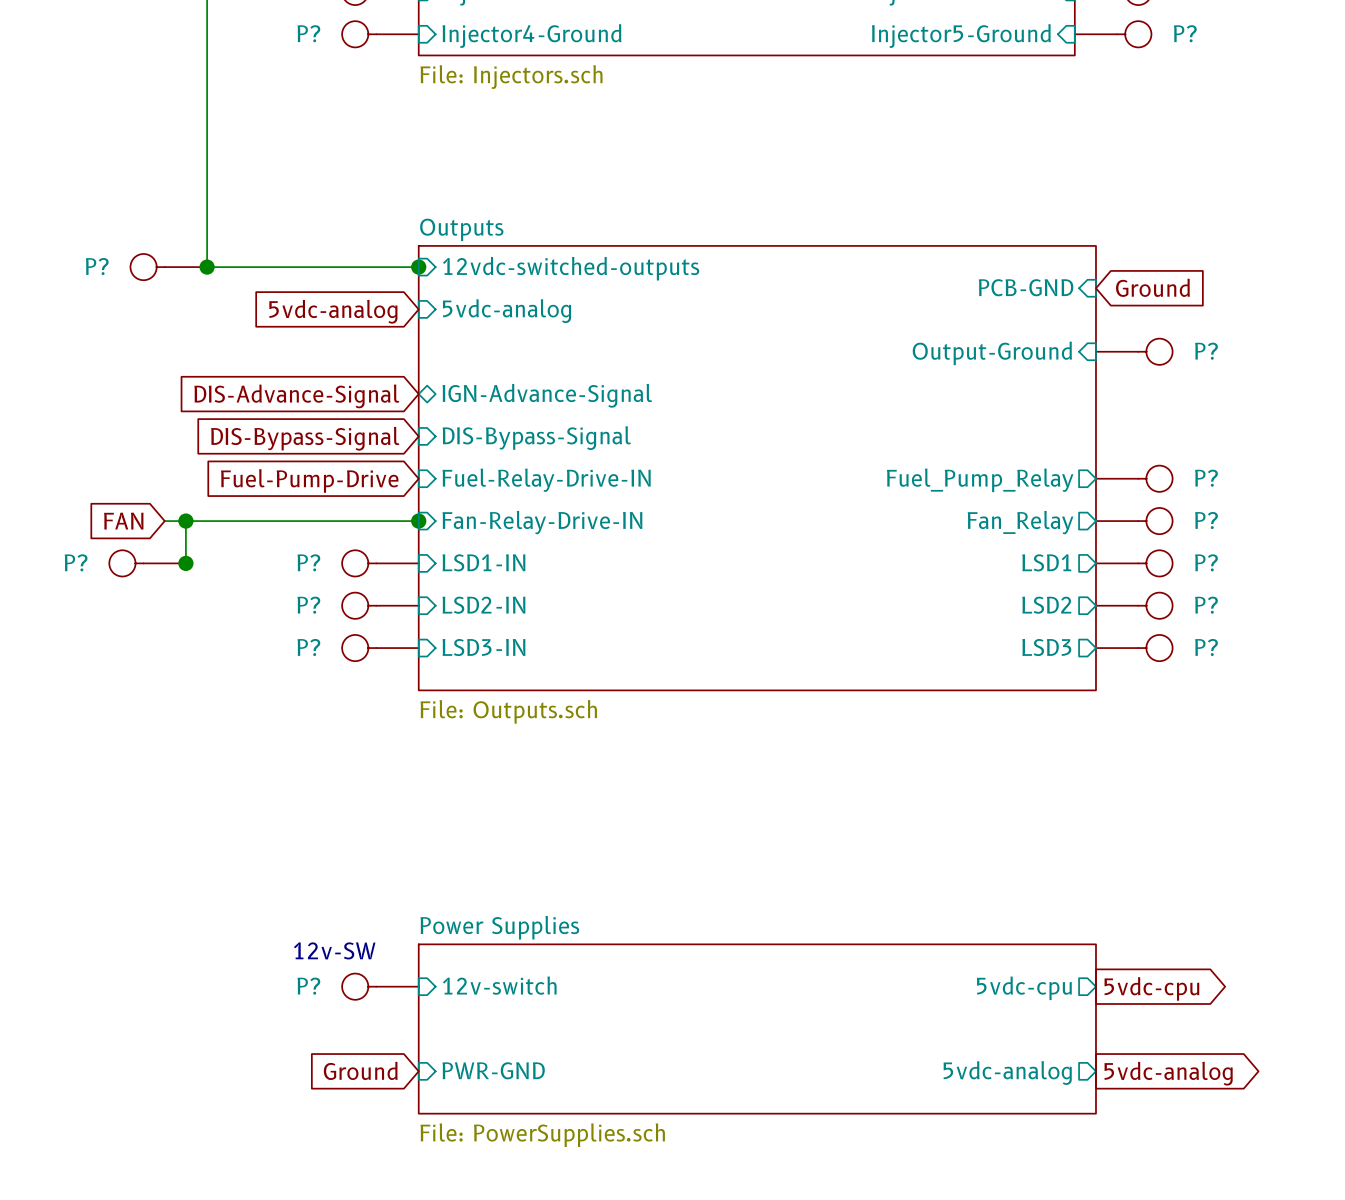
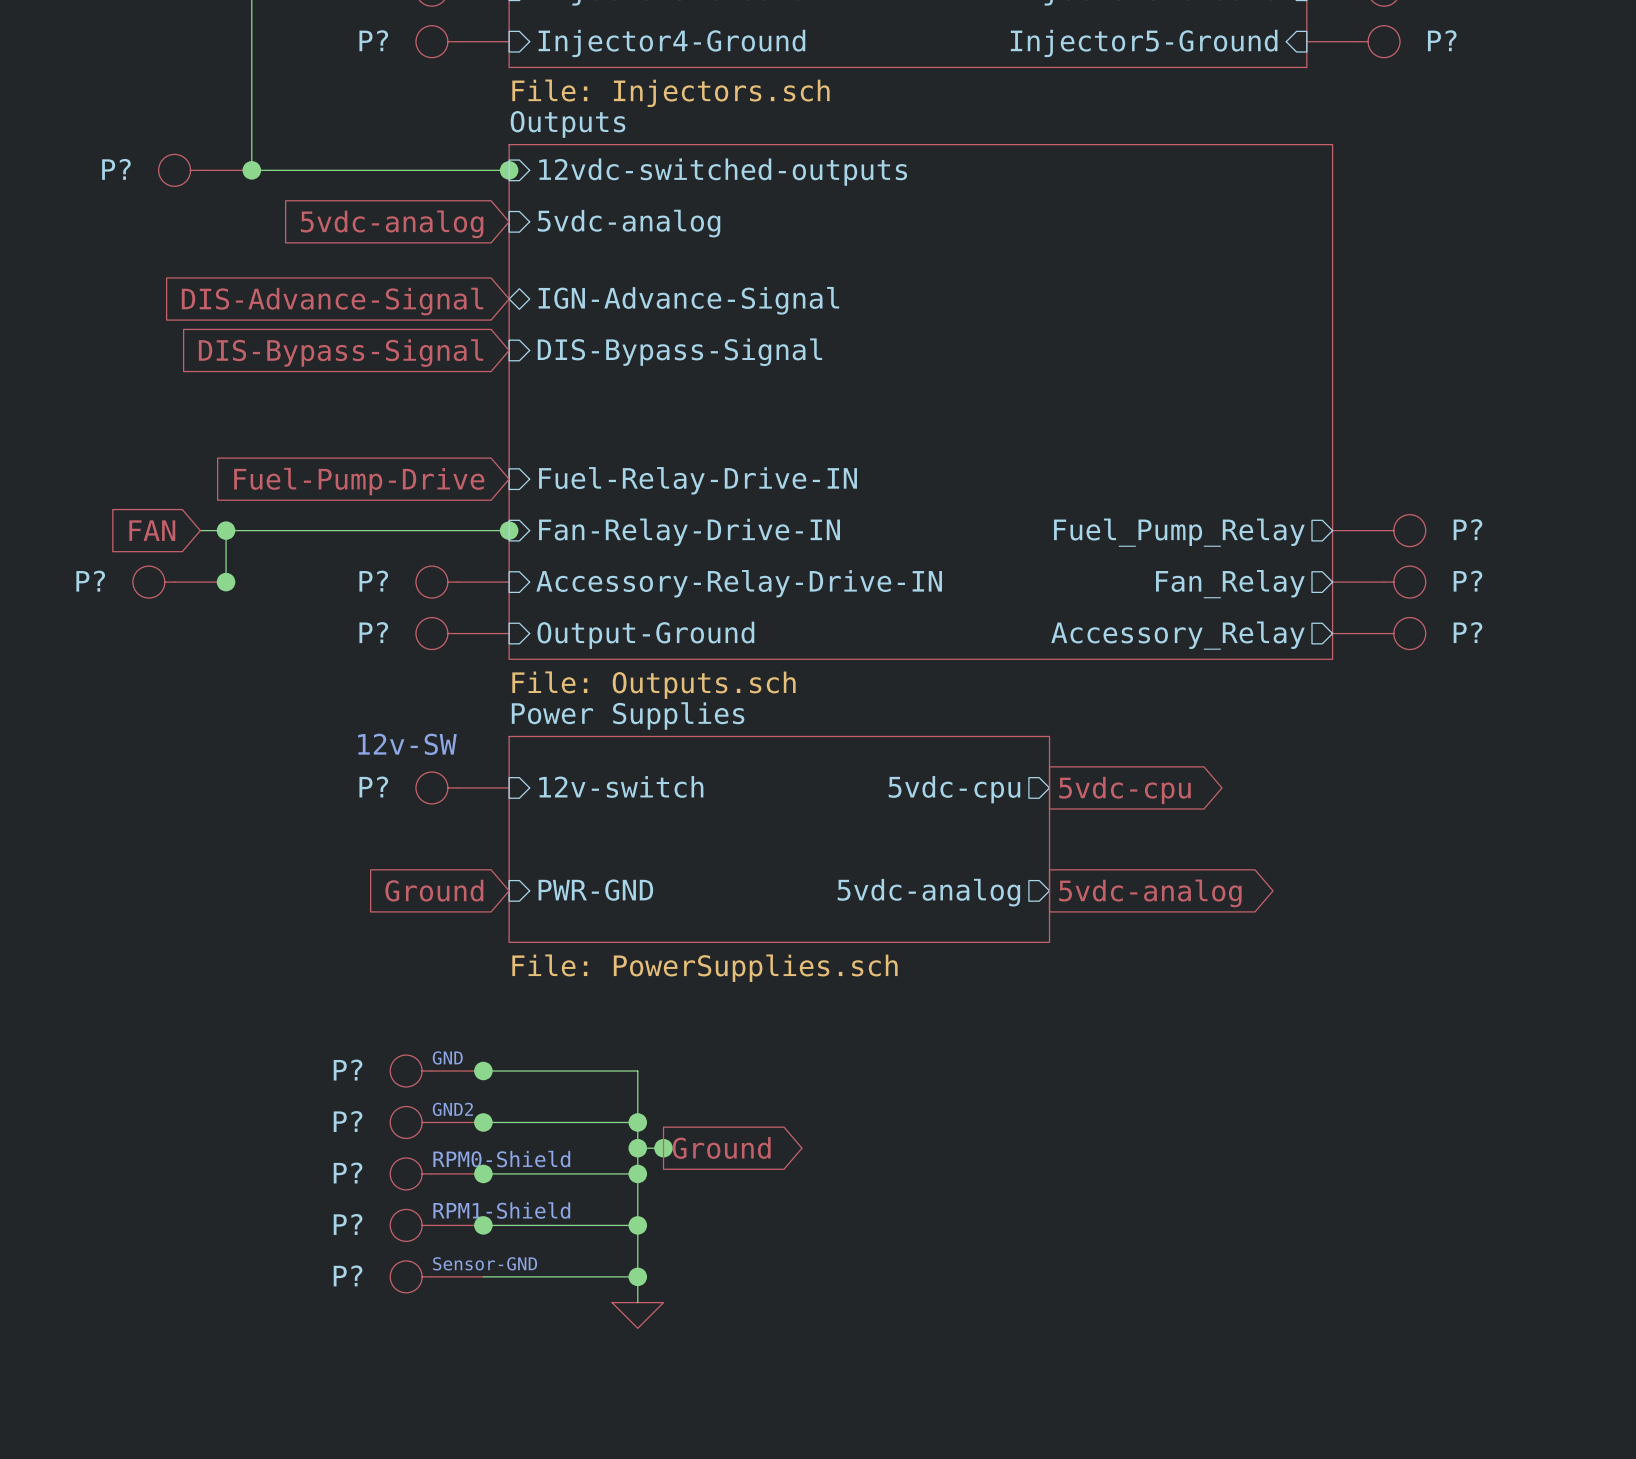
P?: none -> (205, 170)
wire: (207, 140) (207, 267) (418, 267) -> (251, 170) (509, 170)
junction: none -> (251, 170)
junction: none -> (509, 170)
sheet pin: none -> IGN-Advance-Signal (688, 300)
global label: none -> DIS-Advance-Signal (332, 301)
P?: (168, 267) -> none
junction: (207, 267) -> none
junction: (418, 267) -> none
sheet pin position: 12vdc-switched-outputs (571, 268) -> 12vdc-switched-outputs (723, 172)
sheet pin: PCB-GND (1026, 287) -> none
global label: Ground (1152, 287) -> none
sheet pin: none -> DIS-Bypass-Signal (679, 352)
global label position: 5vdc-analog (333, 311) -> 5vdc-analog (392, 224)
sheet pin position: 5vdc-analog (507, 311) -> 5vdc-analog (629, 223)
sheet Outputs: none -> File: Outputs.sch (920, 401)
P?: (1134, 351) -> none
sheet pin: Output-Ground (992, 353) -> none
sheet pin shape: bidirectional (547, 395) -> input (698, 480)
sheet pin: IGN-Advance-Signal (547, 395) -> Fuel-Relay-Drive-IN (698, 480)
global label: DIS-Advance-Signal (296, 396) -> Fuel-Pump-Drive (359, 481)
junction: none -> (226, 530)
junction: none -> (509, 530)
P?: none -> (1379, 530)
global label position: DIS-Bypass-Signal (305, 438) -> DIS-Bypass-Signal (341, 353)
sheet pin: DIS-Bypass-Signal (536, 438) -> Fan-Relay-Drive-IN (689, 532)
sheet pin: none -> Fuel_Pump_Relay (1179, 532)
sheet Outputs: File: Outputs.sch (757, 468) -> none
junction: none -> (226, 582)
P?: none -> (462, 582)
global label: Fuel-Pump-Drive (309, 480) -> none
sheet pin: Fuel-Relay-Drive-IN (546, 480) -> Accessory-Relay-Drive-IN (739, 583)
sheet pin: Fuel_Pump_Relay (980, 480) -> Fan_Relay (1230, 584)
global label position: FAN (123, 521) -> FAN (152, 530)
wire: (164, 521) (418, 521) -> (200, 530) (509, 530)
wire: (185, 521) (185, 563) -> (226, 530) (226, 582)
junction: (185, 521) -> none
P?: none -> (462, 633)
junction: (418, 521) -> none
sheet pin: Fan-Relay-Drive-IN (542, 522) -> Output-Ground (645, 635)
sheet pin: Fan_Relay (1020, 522) -> Accessory_Relay (1178, 635)
sheet pin: LSD1-IN (483, 562) -> none
sheet pin: LSD1 (1046, 562) -> none
P? position: (147, 563) -> (179, 582)
junction: (185, 563) -> none
P?: (380, 563) -> none
P?: (1134, 563) -> none
P?: (380, 605) -> none
sheet pin: LSD2-IN (483, 605) -> none
sheet pin: LSD2 (1046, 605) -> none
P?: (1134, 605) -> none
sheet pin: LSD3-IN (483, 647) -> 12v-switch (621, 786)
sheet pin: LSD3 (1046, 647) -> none
P?: (1134, 648) -> none
sheet Power Supplies: none -> File: PowerSupplies.sch (779, 839)
global label: none -> Ground (434, 890)
sheet pin: none -> 5vdc-analog (928, 892)
global label: none -> 5vdc-analog (1150, 893)
text: none -> GND (447, 1057)
P?: none -> (436, 1071)
wire: none -> (483, 1071) (637, 1071) (637, 1302)
junction: none -> (483, 1071)
text: none -> GND2 (452, 1109)
P?: none -> (436, 1122)
wire: none -> (483, 1122) (637, 1122)
junction: none -> (483, 1122)
junction: none -> (637, 1122)
global label: none -> Ground (721, 1147)
junction: none -> (637, 1148)
junction: none -> (663, 1148)
text position: 12v-SW (334, 950) -> 12v-SW (407, 744)
text: none -> RPM0-Shield (501, 1159)
P?: none -> (436, 1173)
wire: none -> (483, 1173) (637, 1173)
junction: none -> (483, 1173)
junction: none -> (637, 1173)
sheet pin: 12v-switch (499, 985) -> none
P?: (380, 986) -> none
sheet pin position: 5vdc-cpu (1024, 988) -> 5vdc-cpu (954, 789)
global label position: 5vdc-cpu (1151, 988) -> 5vdc-cpu (1124, 790)
text: none -> RPM1-Shield (501, 1210)
P?: none -> (436, 1225)
wire: none -> (483, 1225) (637, 1225)
junction: none -> (483, 1225)
junction: none -> (637, 1225)
sheet Power Supplies: File: PowerSupplies.sch (757, 1029) -> none
text: none -> Sensor-GND (485, 1263)
P?: none -> (436, 1276)
wire: none -> (483, 1276) (637, 1276)
junction: none -> (637, 1276)
global label: Ground (360, 1070) -> none
sheet pin position: PWR-GND (493, 1070) -> PWR-GND (595, 890)
sheet pin: 5vdc-analog (1007, 1073) -> none
global label: 5vdc-analog (1168, 1073) -> none
power symbol: none -> (637, 1315)

